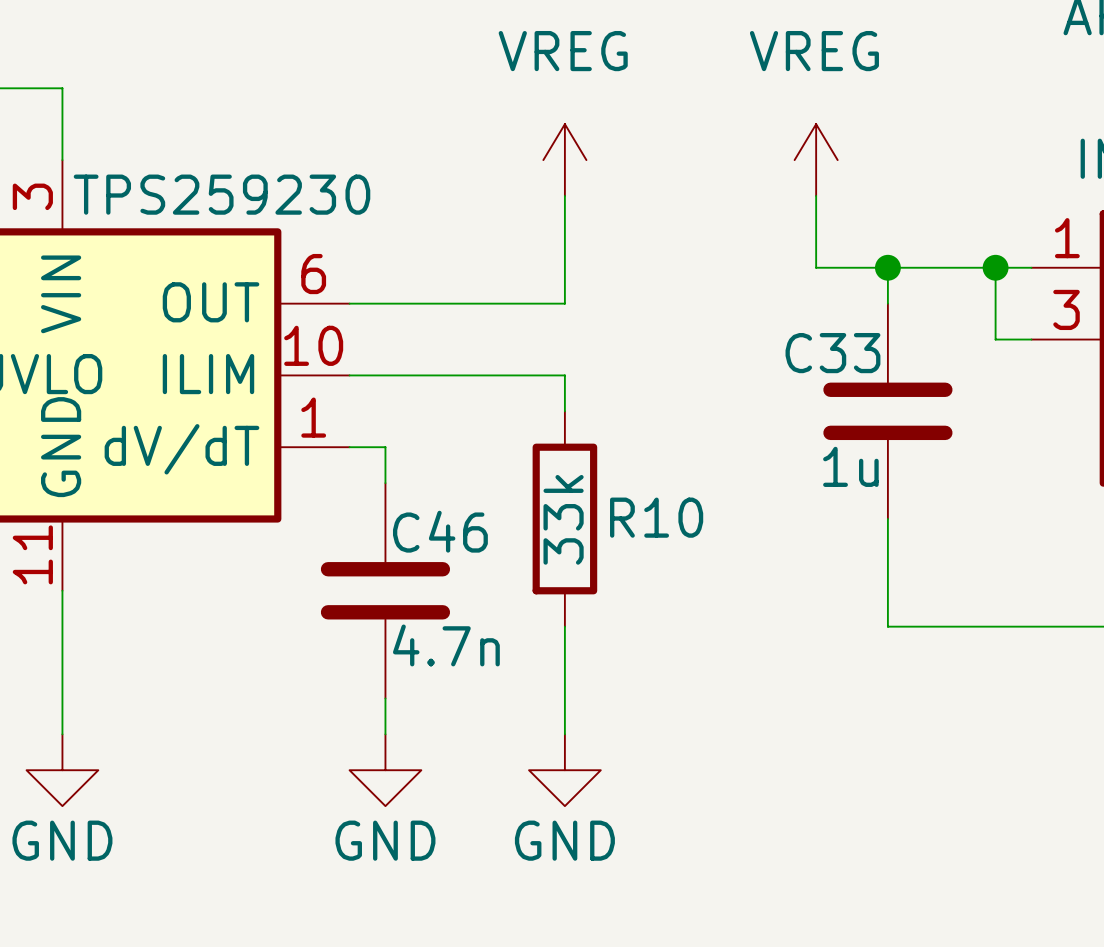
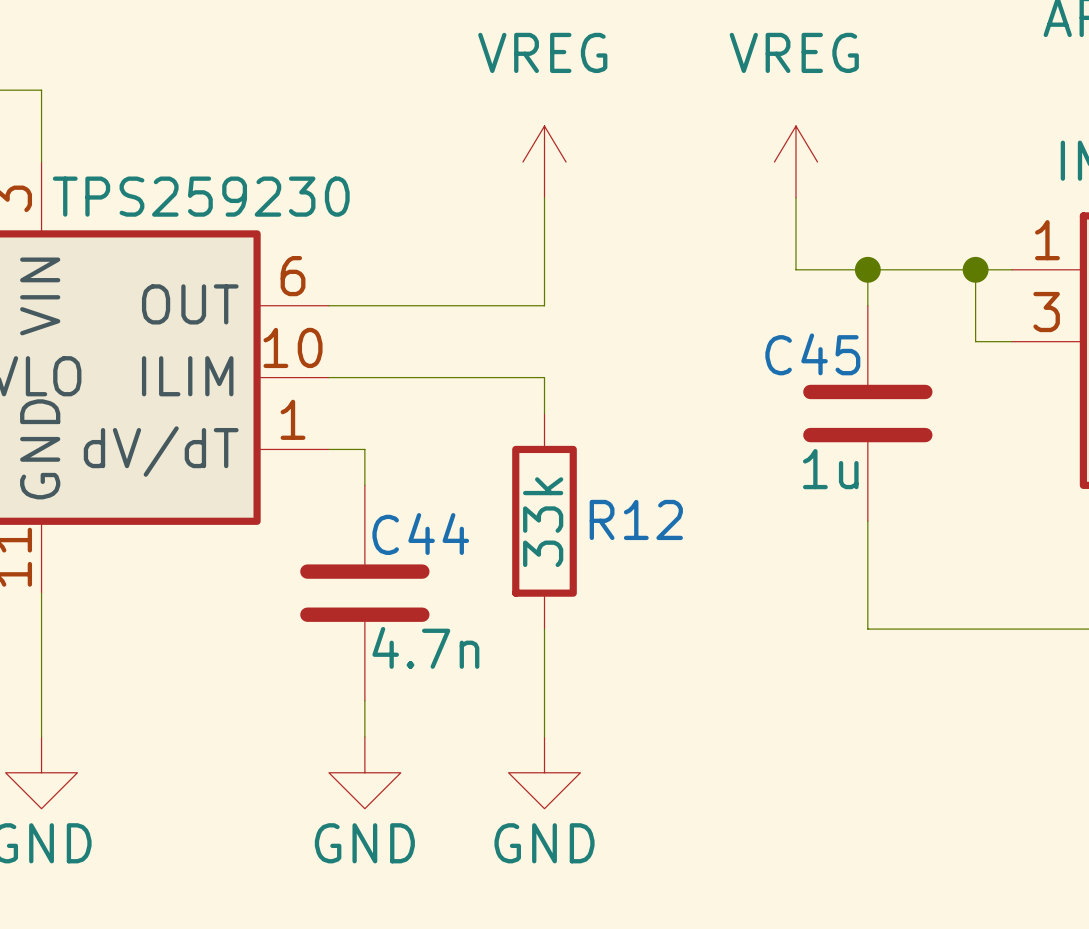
C33 name: C33 (832, 353) -> C45 (812, 354)
R10 name: R10 (656, 517) -> R12 (636, 519)
C46 name: C46 (440, 531) -> C44 (420, 534)

